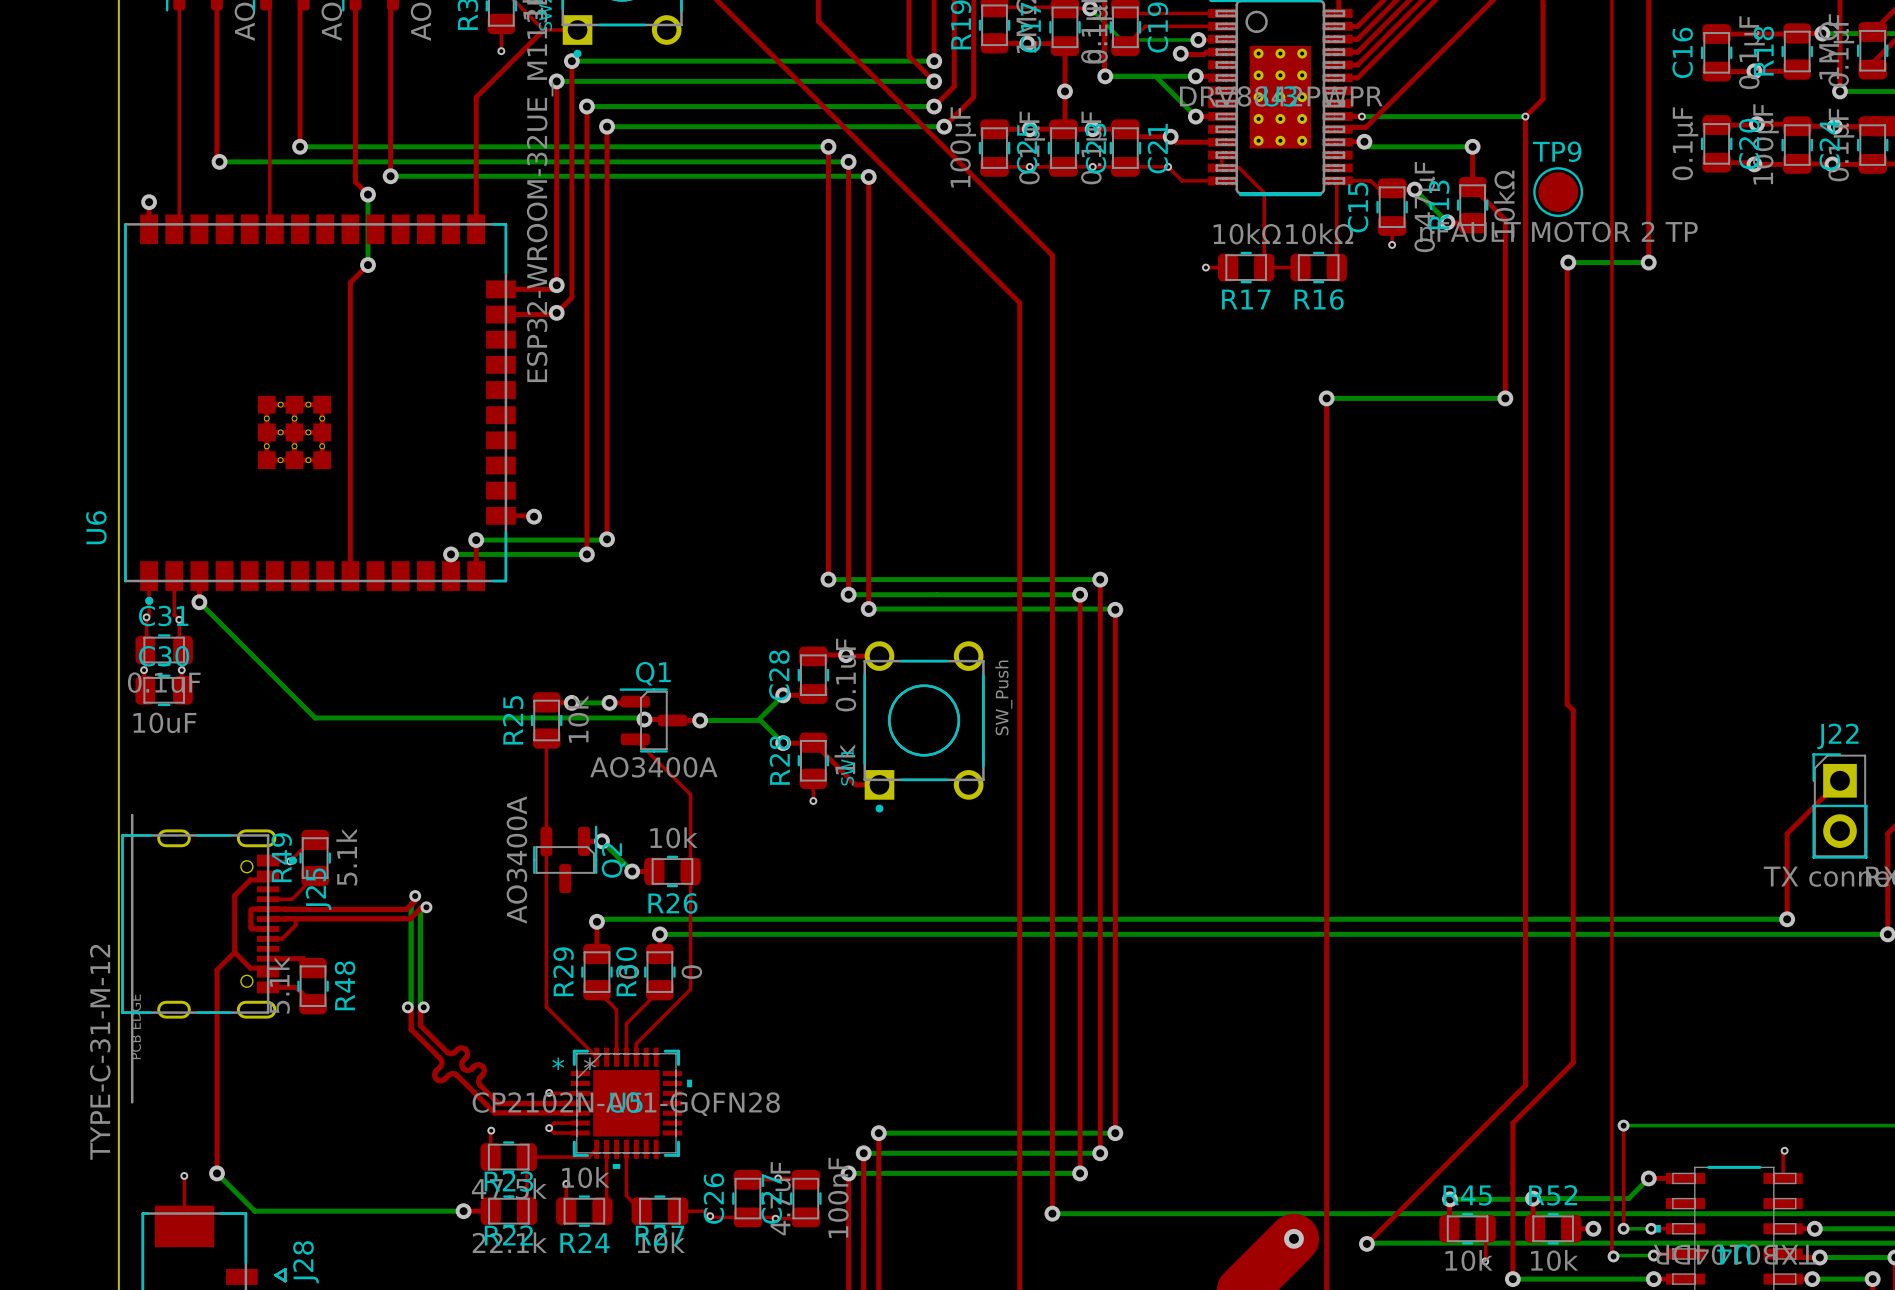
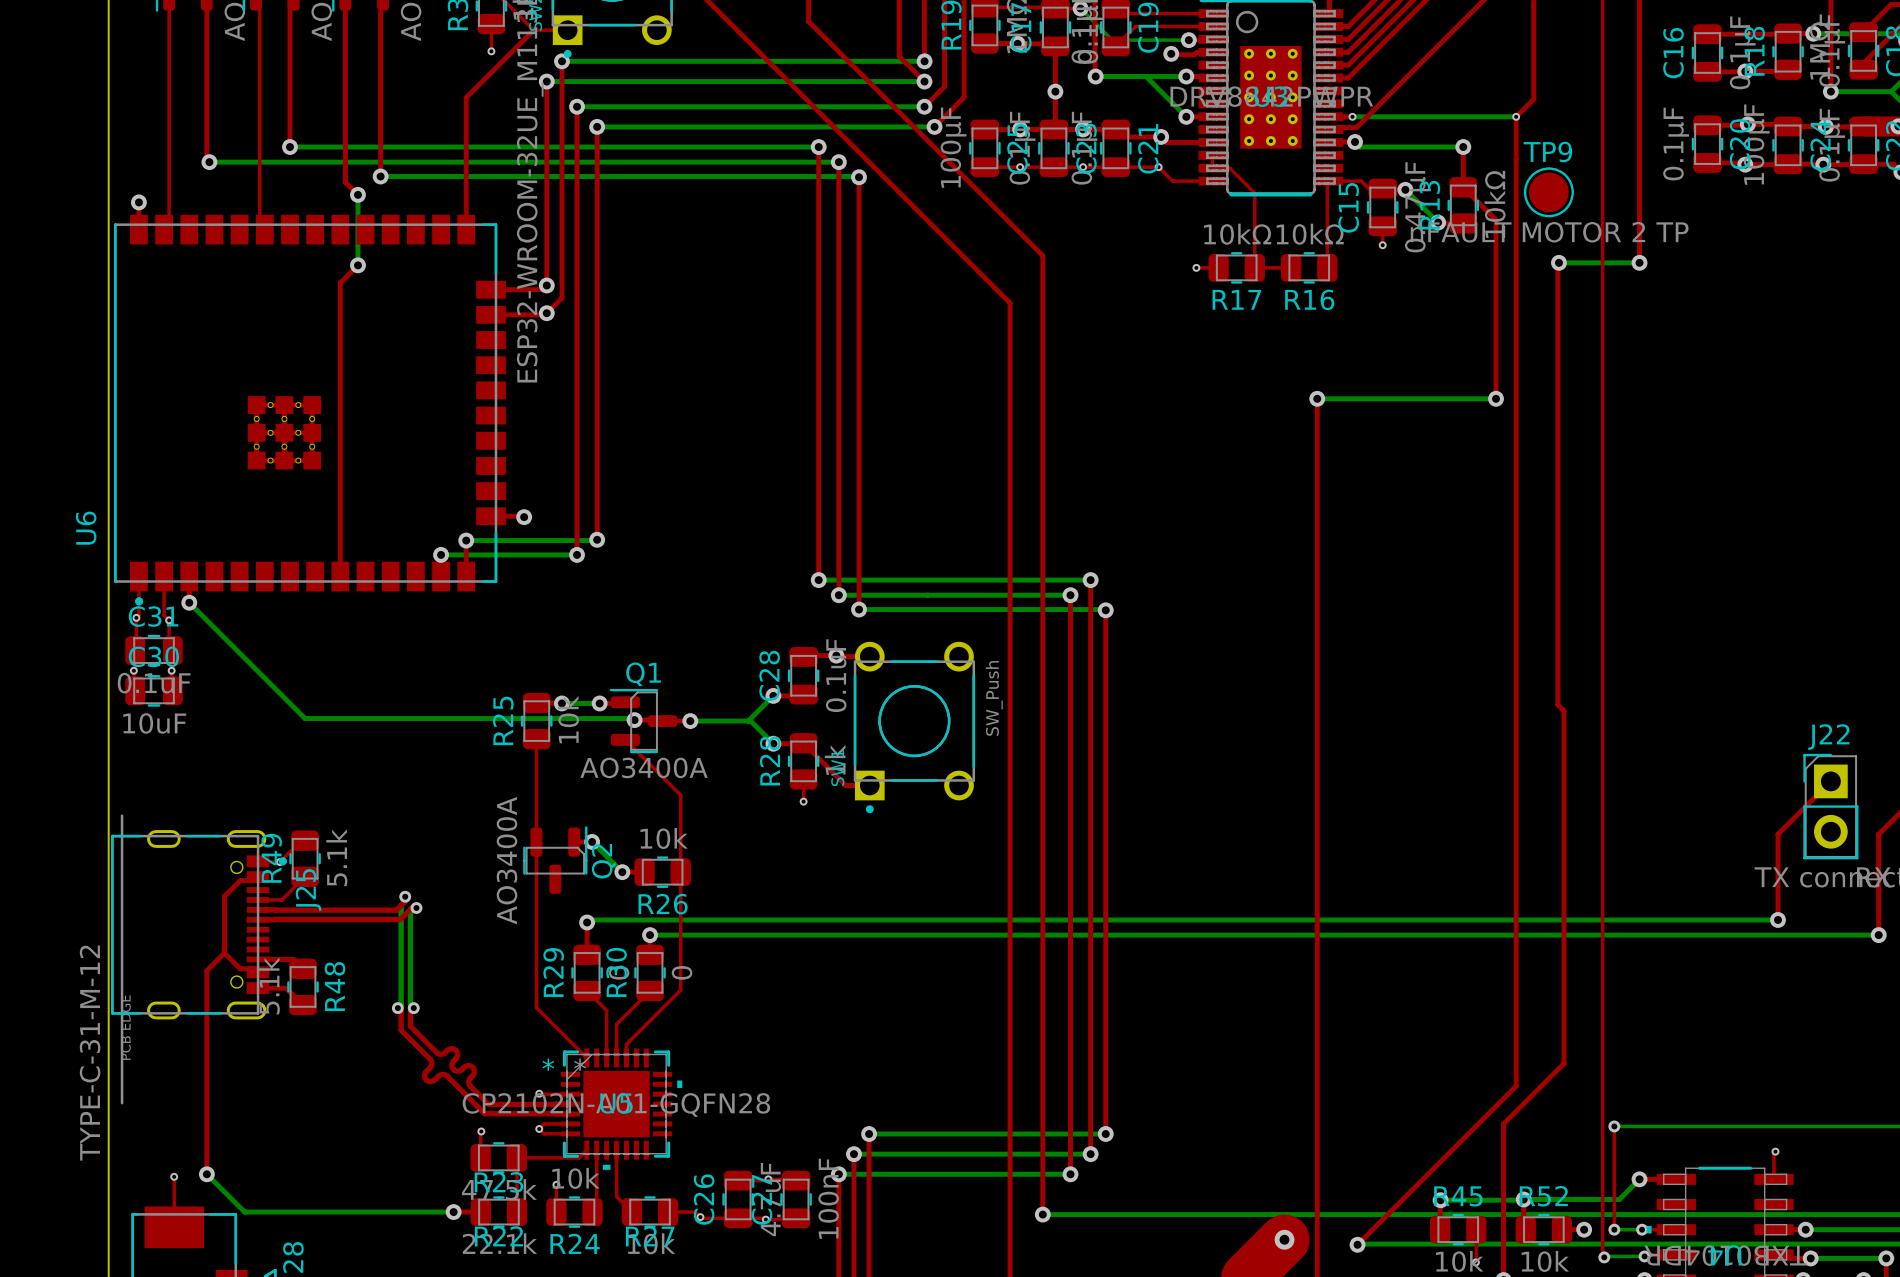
top track: (268, 909) (250, 910) (250, 927) (268, 928) -> none
top track: (295, 920) (295, 925) (282, 938) (268, 938) -> none

